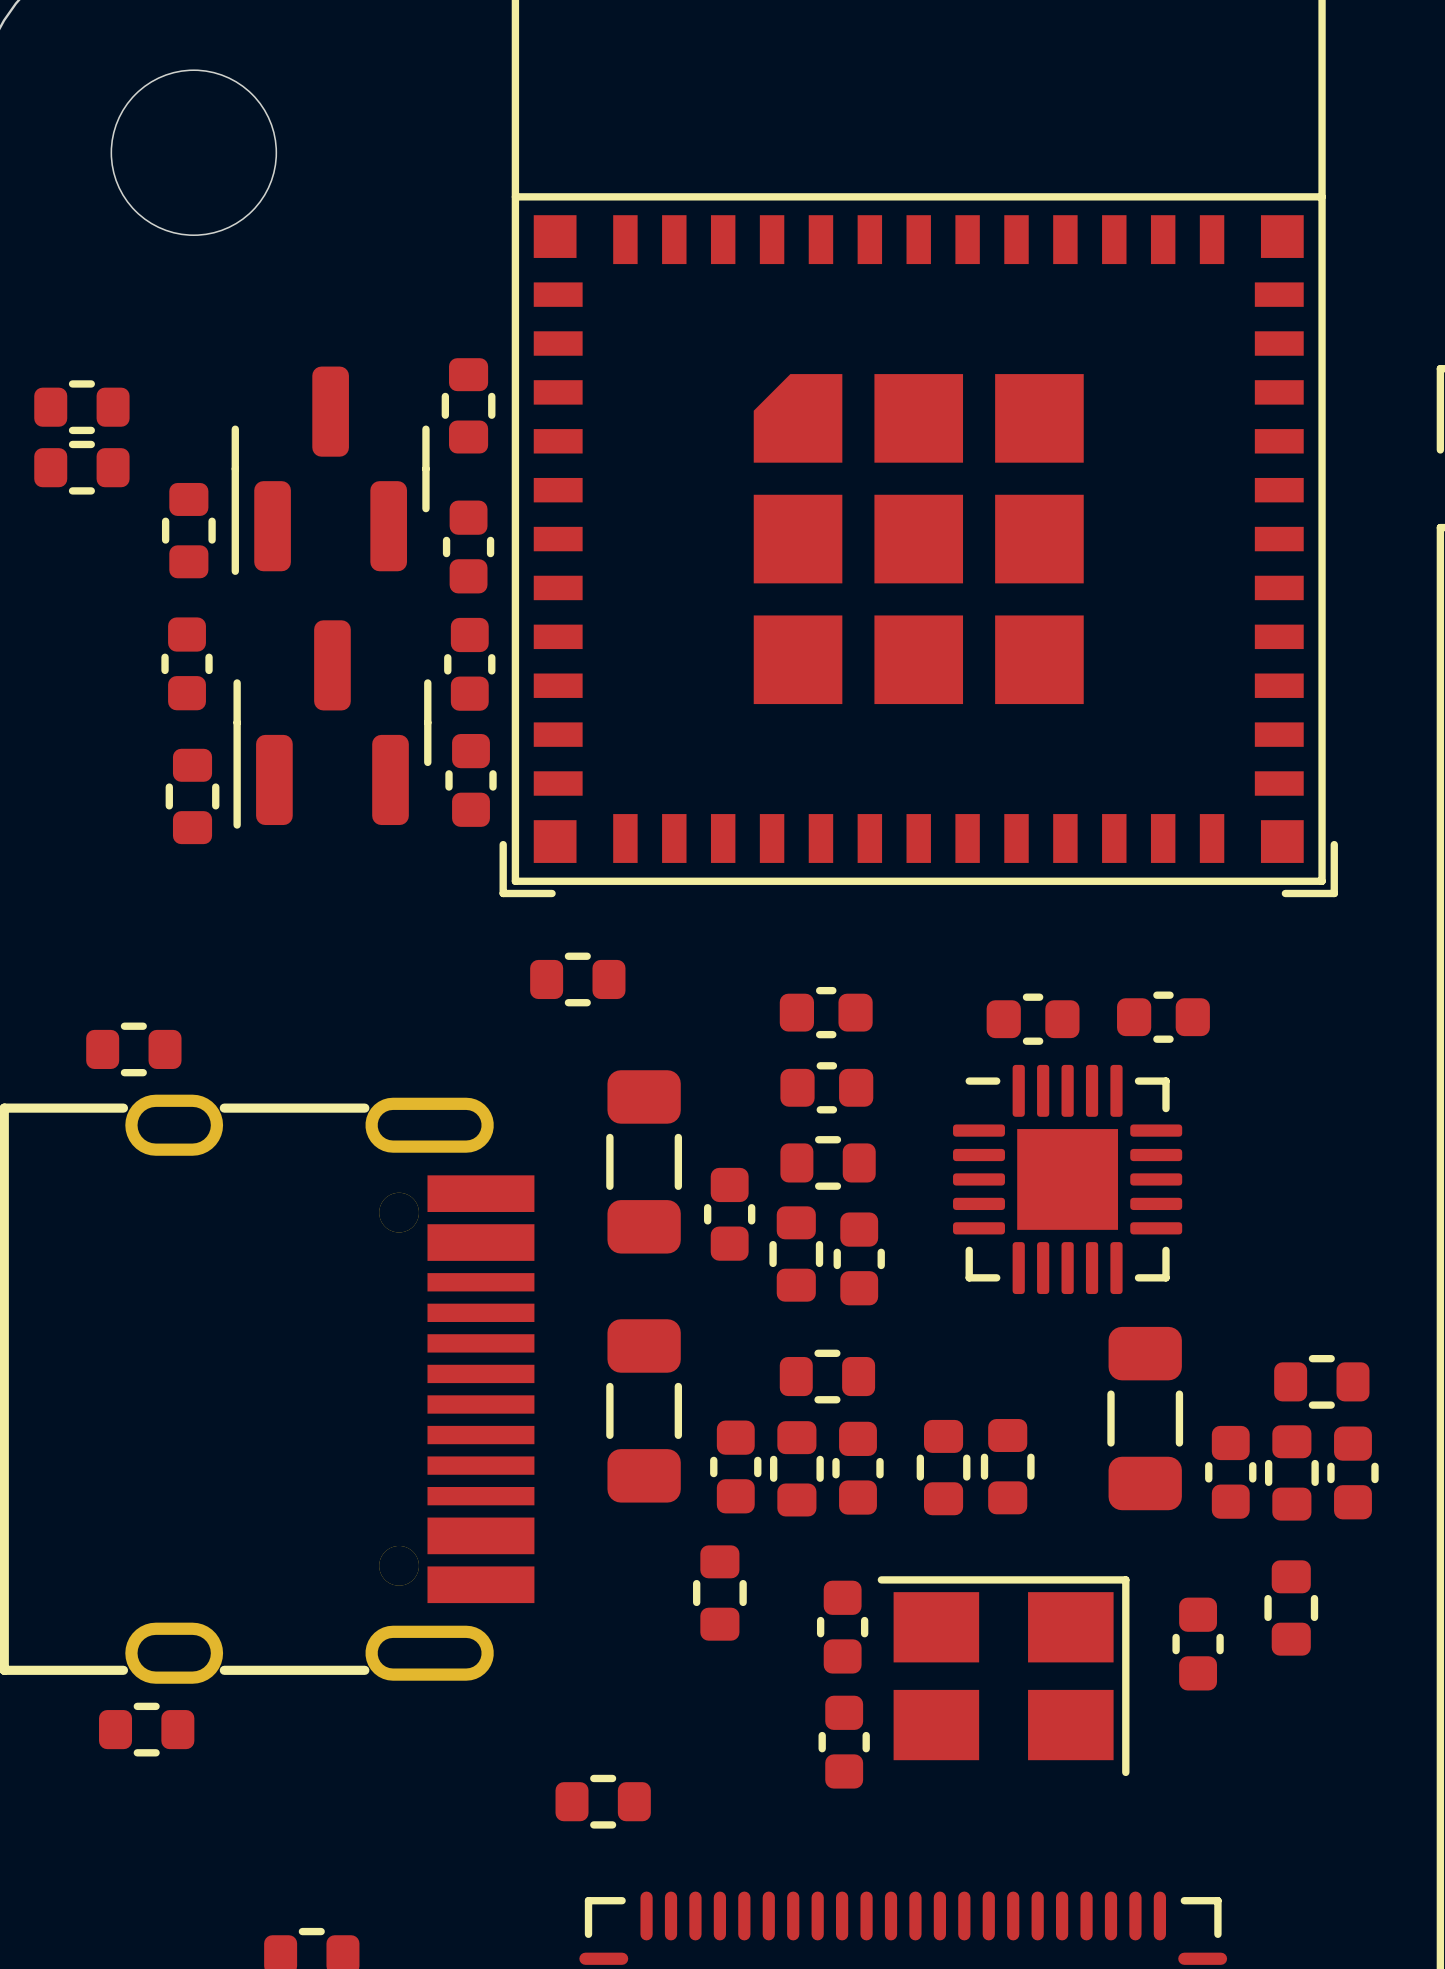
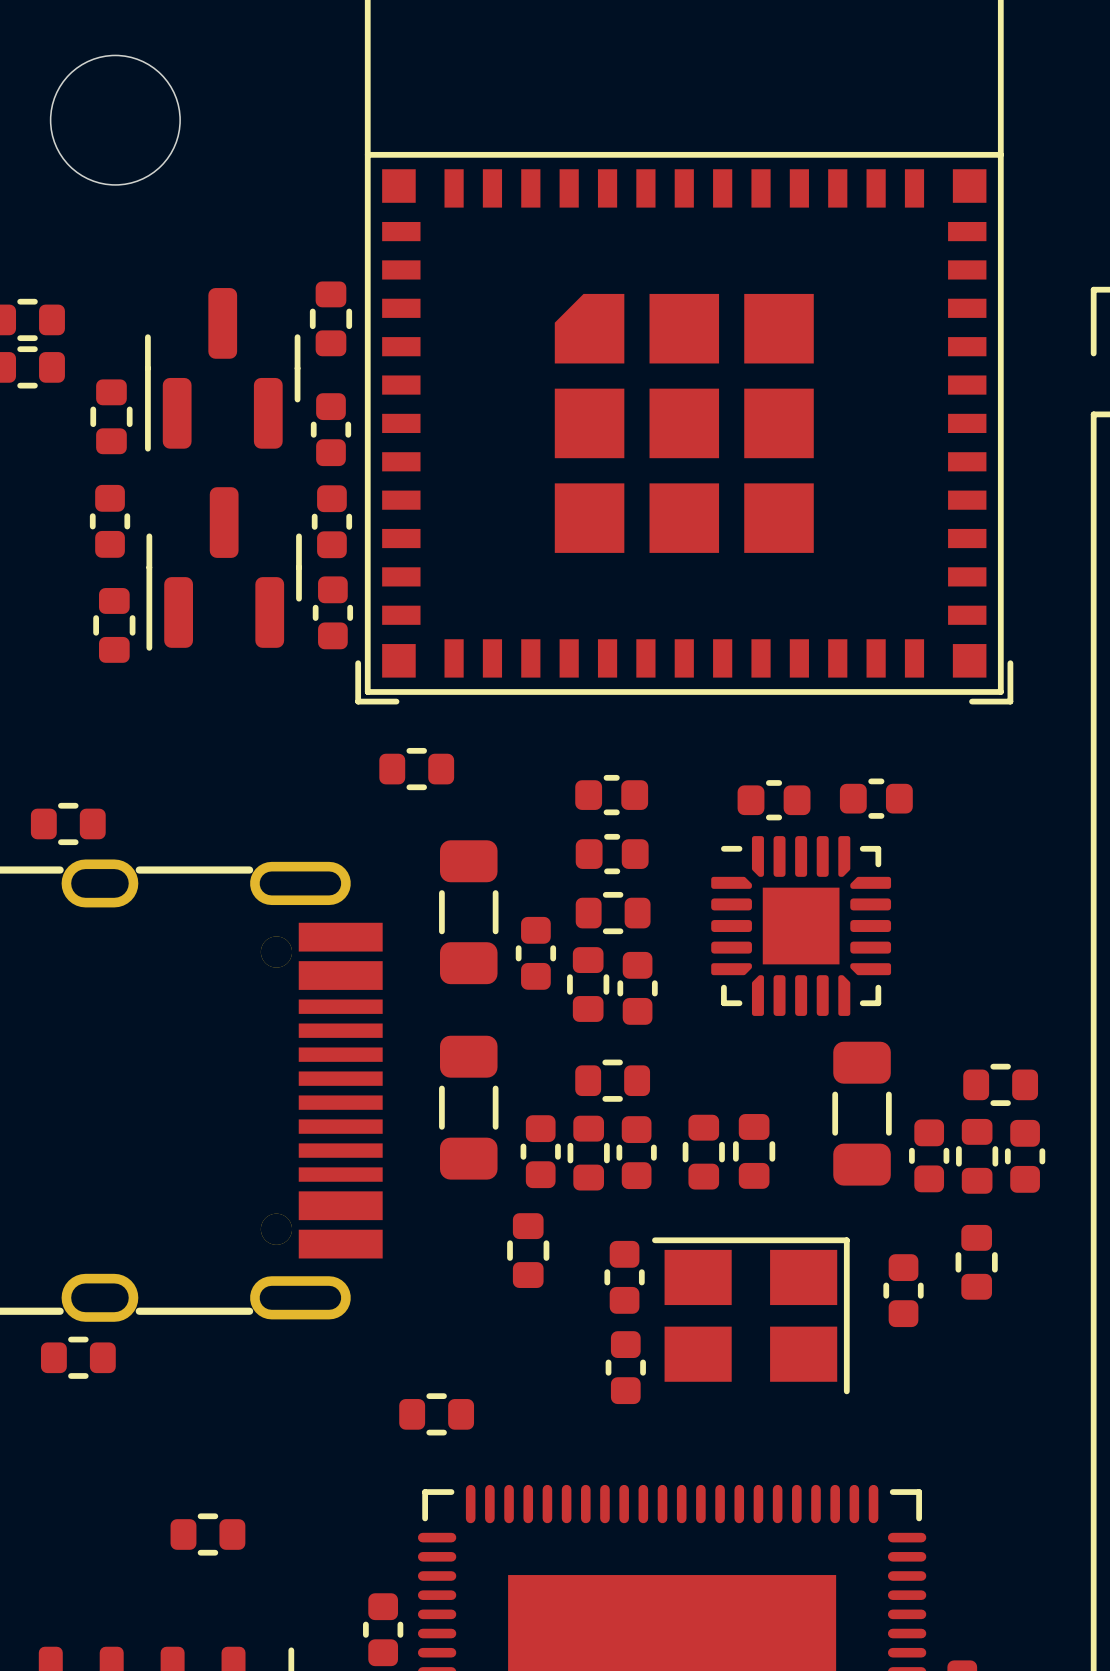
part footprint: [953, 1064, 1183, 1295] -> [711, 836, 892, 1016]

